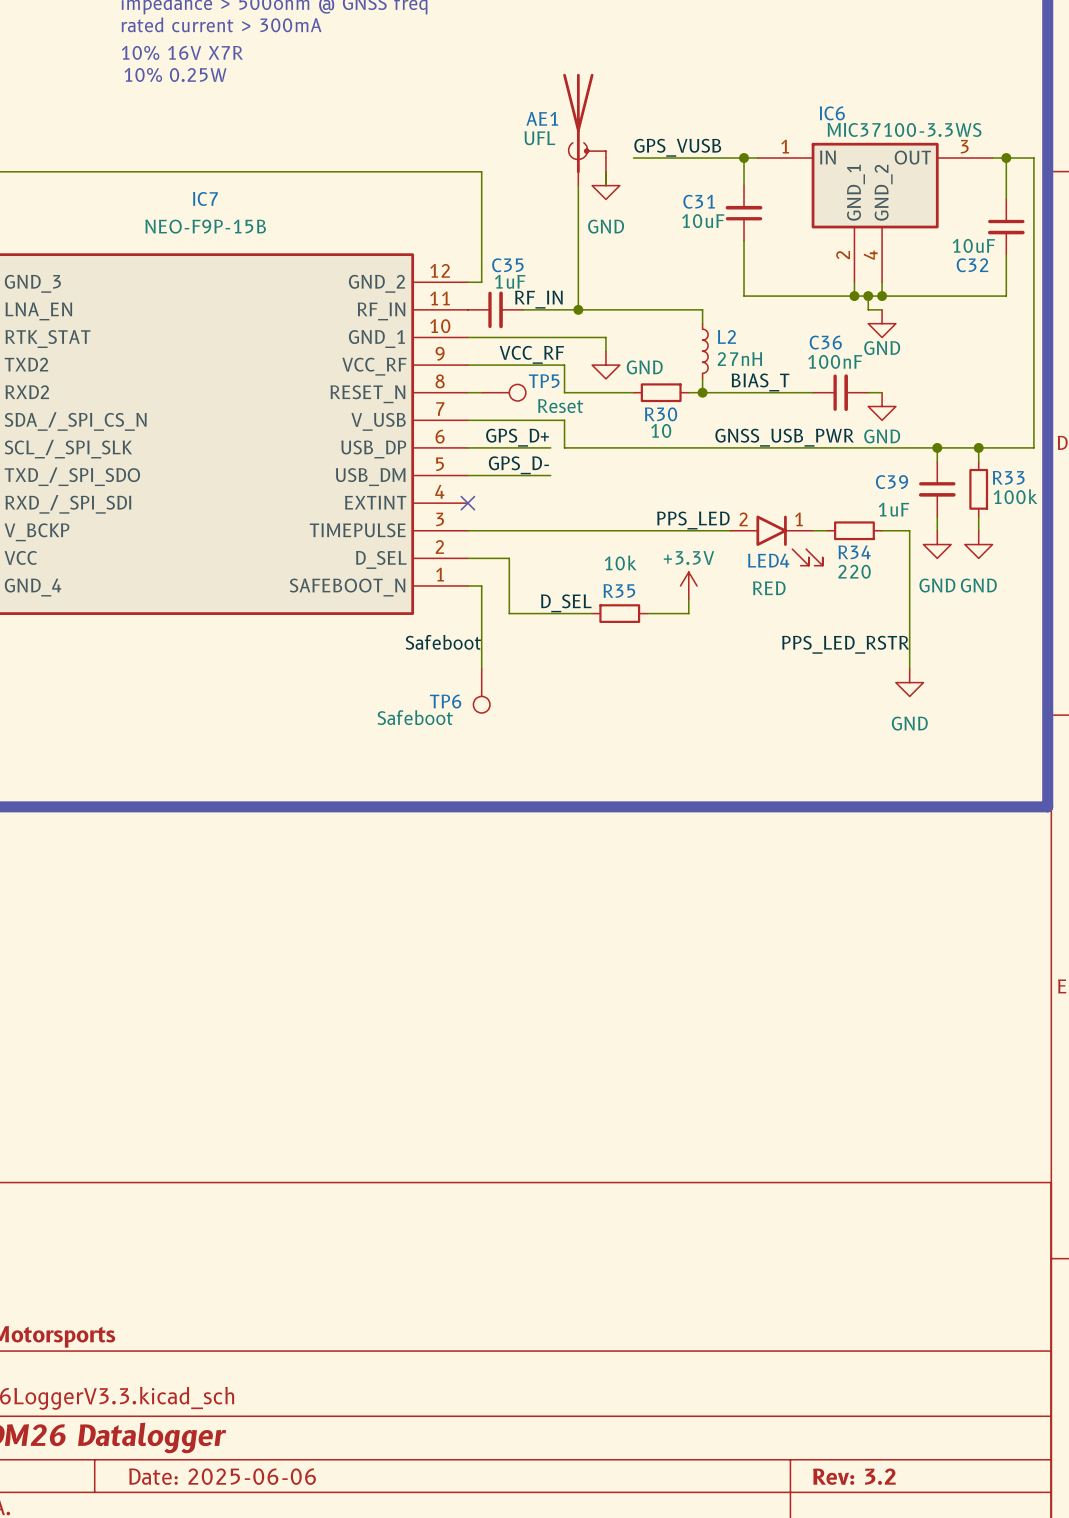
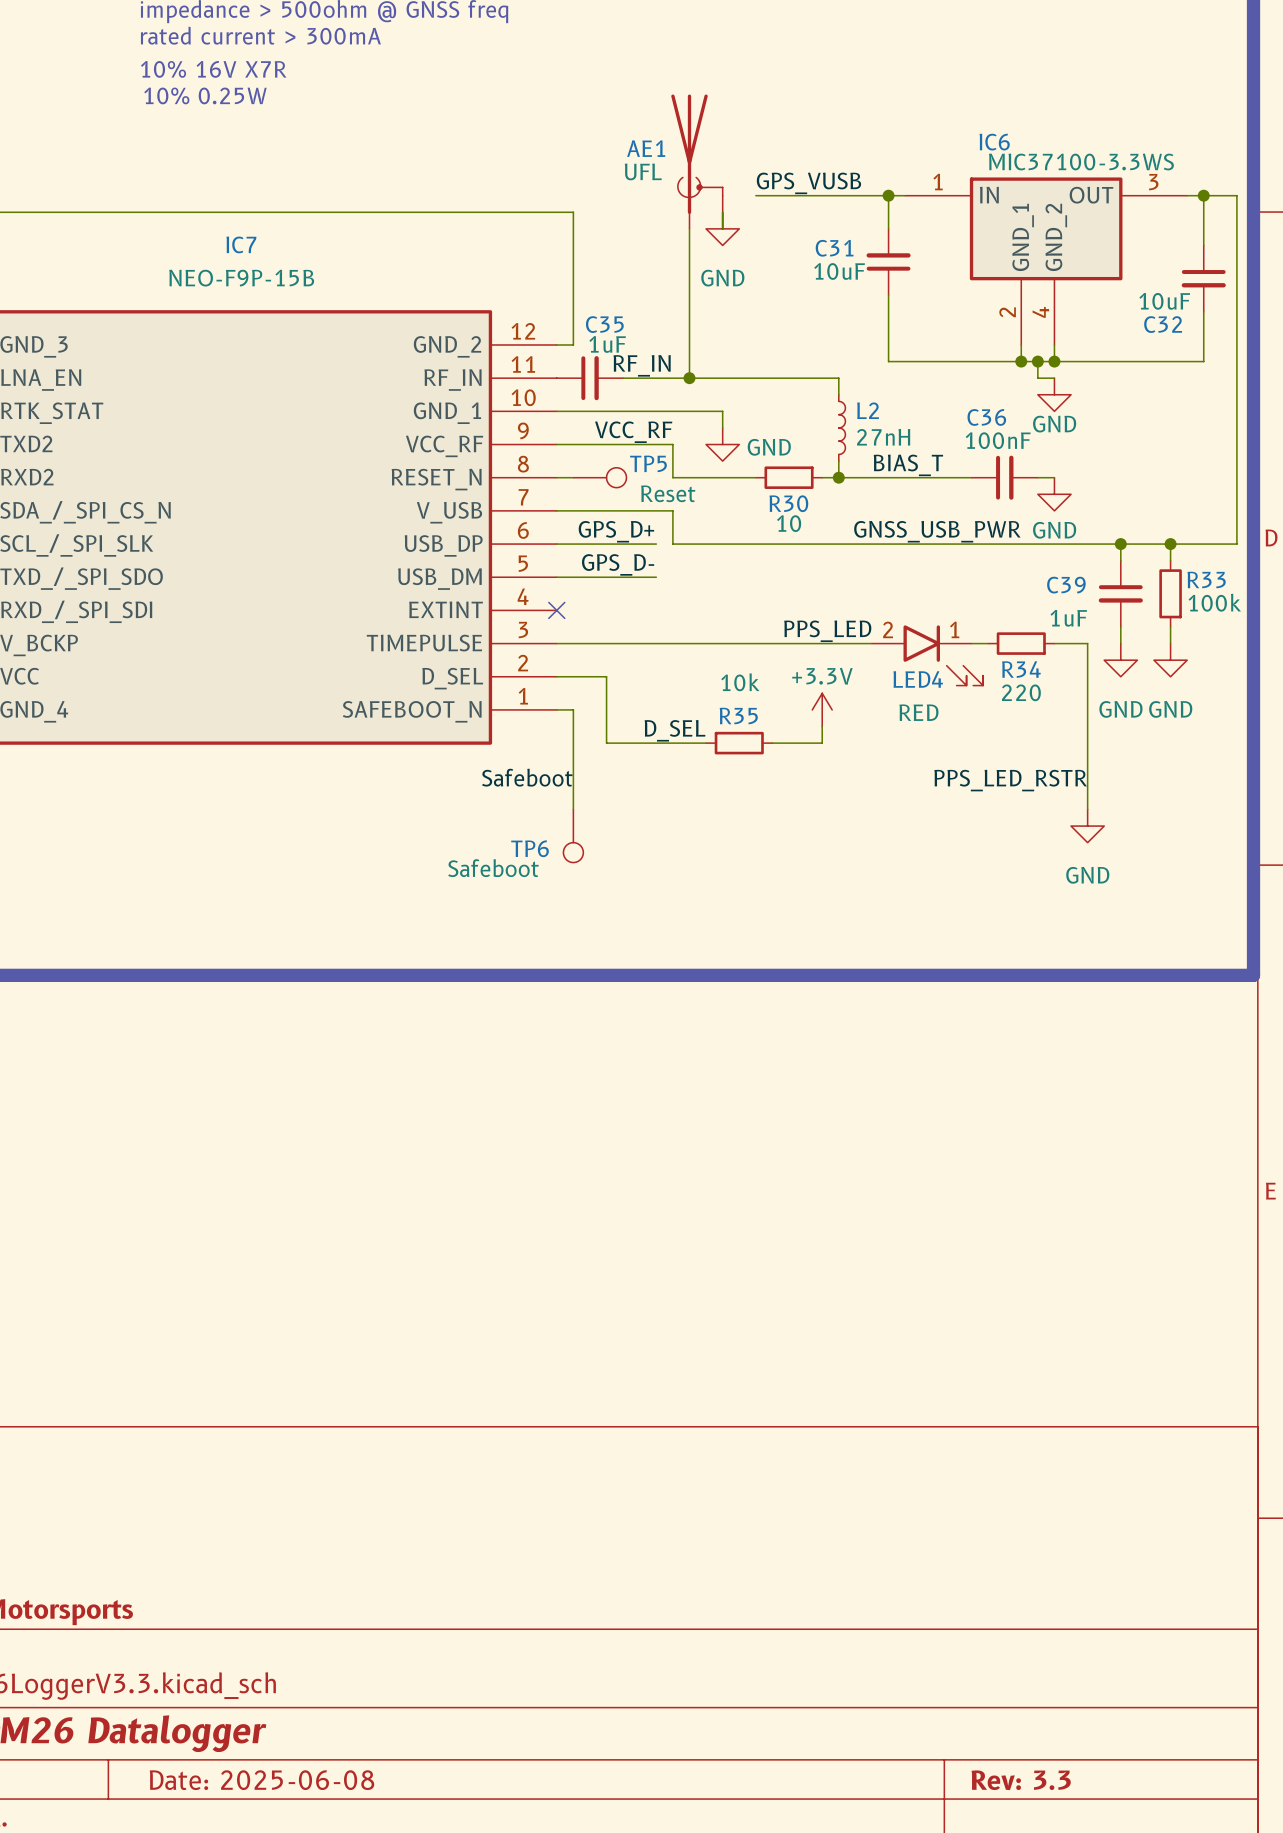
title block: Date: 2025-06-06 (222, 1476) -> Date: 2025-06-08 (261, 1780)
title block: Rev: 3.2 (854, 1476) -> Rev: 3.3 (1021, 1780)

